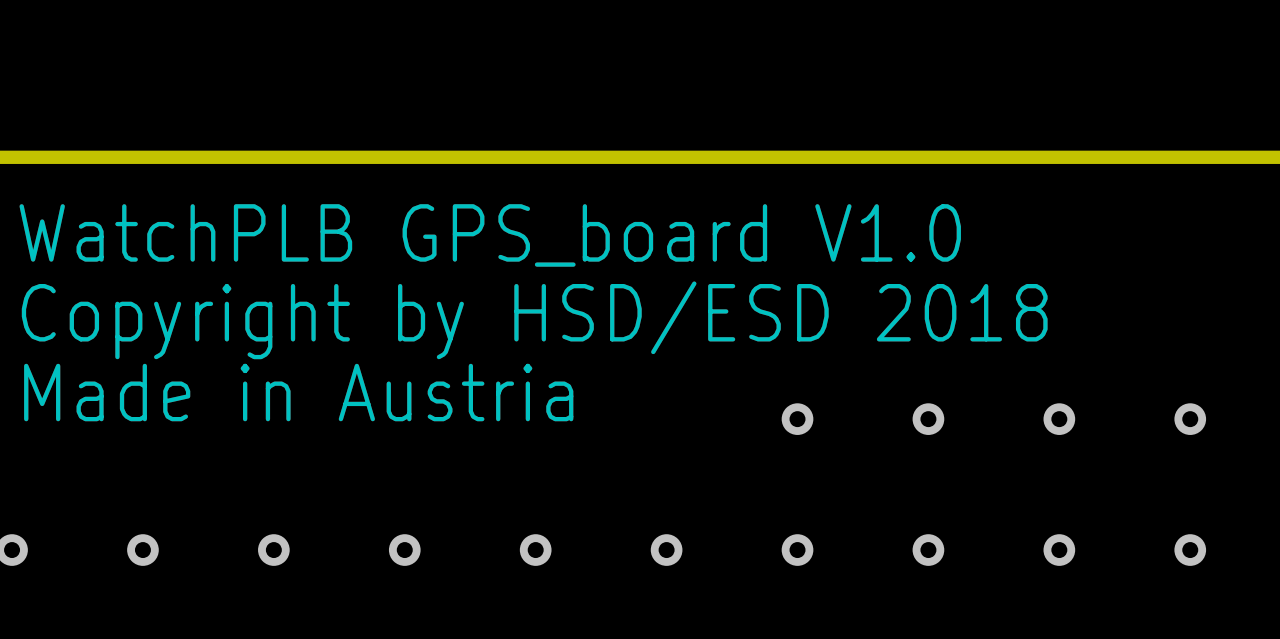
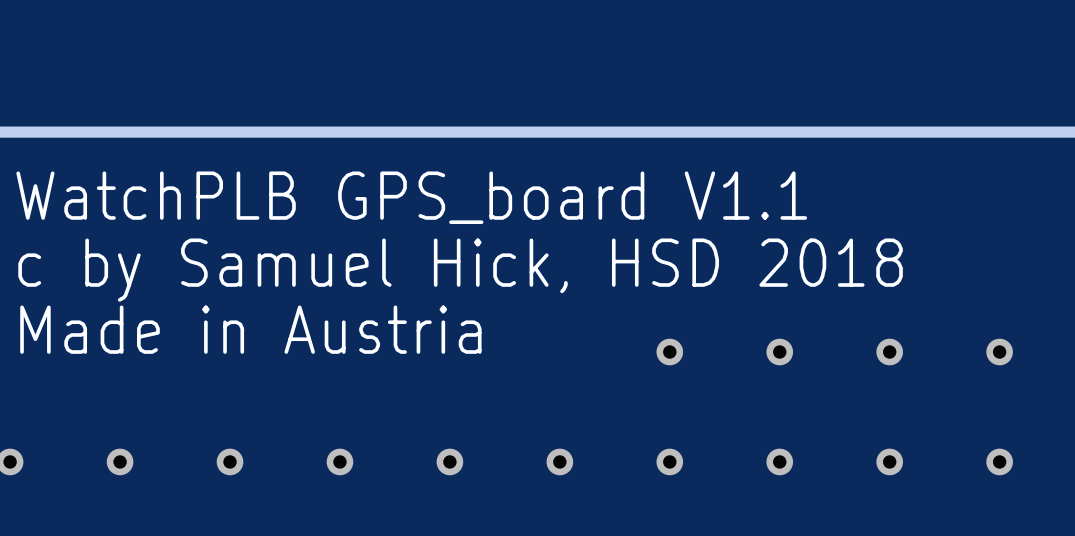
text: WatchPLB GPS_board V1.0 (490, 235) -> none
text: none -> WatchPLB GPS_board V1.1 (411, 197)
text: Copyright by HSD/ESD 2018 (534, 320) -> none
text: none -> c by Samuel Hick, HSD 2018 (460, 270)

